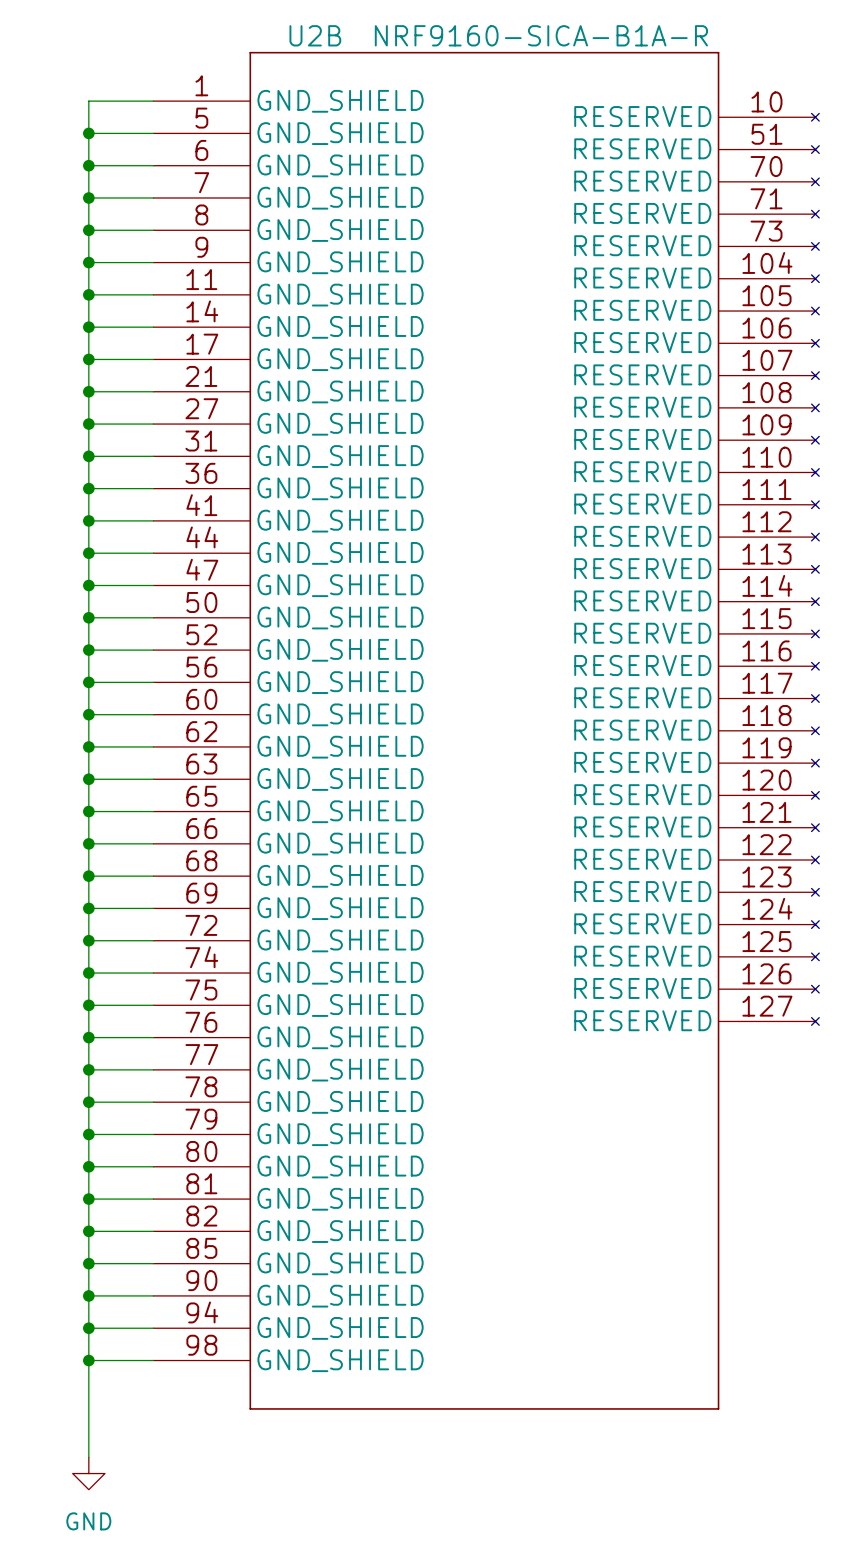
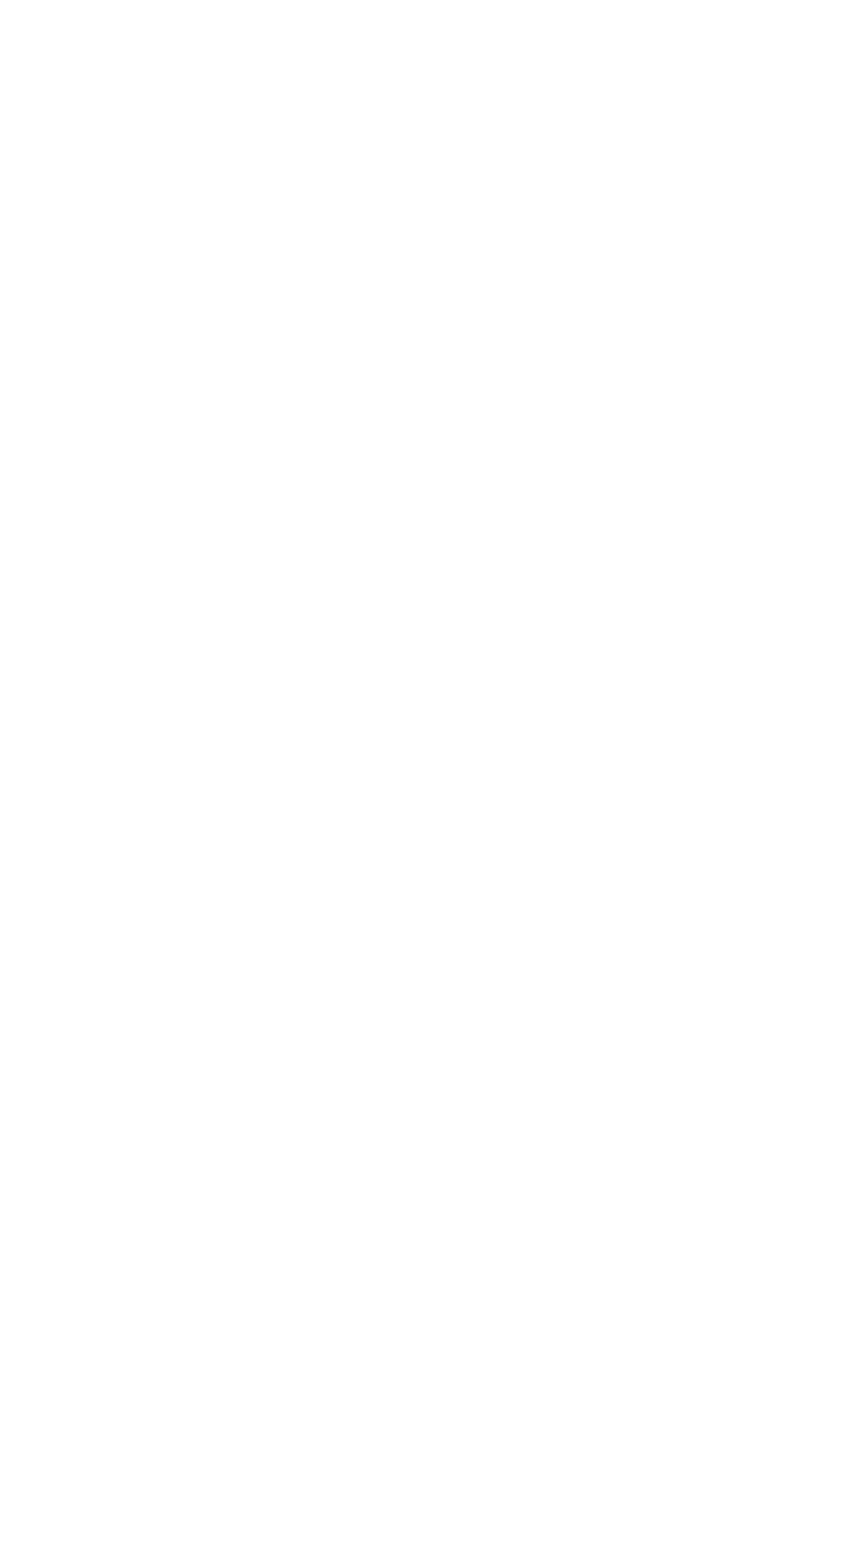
wire: (153, 101) (88, 101) (88, 1457) -> none
wire: (88, 133) (153, 133) -> none
junction: (88, 133) -> none
wire: (88, 165) (153, 165) -> none
junction: (88, 165) -> none
wire: (88, 197) (153, 197) -> none
junction: (88, 197) -> none
wire: (88, 230) (153, 230) -> none
junction: (88, 230) -> none
wire: (88, 262) (153, 262) -> none
junction: (88, 262) -> none
wire: (88, 294) (153, 294) -> none
junction: (88, 294) -> none
wire: (88, 327) (153, 327) -> none
junction: (88, 327) -> none
wire: (88, 359) (153, 359) -> none
junction: (88, 359) -> none
wire: (88, 391) (153, 391) -> none
junction: (88, 391) -> none
wire: (88, 424) (153, 424) -> none
junction: (88, 424) -> none
wire: (88, 456) (153, 456) -> none
junction: (88, 456) -> none
wire: (88, 488) (153, 488) -> none
junction: (88, 488) -> none
wire: (88, 520) (153, 520) -> none
junction: (88, 520) -> none
wire: (88, 553) (153, 553) -> none
junction: (88, 553) -> none
wire: (88, 585) (153, 585) -> none
junction: (88, 585) -> none
wire: (88, 617) (153, 617) -> none
junction: (88, 617) -> none
wire: (88, 650) (153, 650) -> none
junction: (88, 650) -> none
wire: (88, 682) (153, 682) -> none
junction: (88, 682) -> none
wire: (88, 714) (153, 714) -> none
junction: (88, 714) -> none
U2B: NRF9160-SICA-B1A-R (486, 730) -> none
wire: (88, 746) (153, 746) -> none
junction: (88, 746) -> none
wire: (88, 779) (153, 779) -> none
junction: (88, 779) -> none
wire: (88, 811) (153, 811) -> none
junction: (88, 811) -> none
wire: (88, 843) (153, 843) -> none
junction: (88, 843) -> none
wire: (88, 876) (153, 876) -> none
junction: (88, 876) -> none
wire: (88, 908) (153, 908) -> none
junction: (88, 908) -> none
wire: (88, 940) (153, 940) -> none
junction: (88, 940) -> none
wire: (88, 973) (153, 973) -> none
junction: (88, 973) -> none
wire: (88, 1005) (153, 1005) -> none
junction: (88, 1005) -> none
wire: (88, 1037) (153, 1037) -> none
junction: (88, 1037) -> none
wire: (88, 1069) (153, 1069) -> none
junction: (88, 1069) -> none
wire: (88, 1102) (153, 1102) -> none
junction: (88, 1102) -> none
wire: (88, 1134) (153, 1134) -> none
junction: (88, 1134) -> none
wire: (88, 1166) (153, 1166) -> none
junction: (88, 1166) -> none
wire: (88, 1199) (153, 1199) -> none
junction: (88, 1199) -> none
wire: (88, 1231) (153, 1231) -> none
junction: (88, 1231) -> none
wire: (88, 1263) (153, 1263) -> none
junction: (88, 1263) -> none
wire: (88, 1295) (153, 1295) -> none
junction: (88, 1295) -> none
wire: (88, 1328) (153, 1328) -> none
junction: (88, 1328) -> none
wire: (88, 1360) (153, 1360) -> none
junction: (88, 1360) -> none
power symbol: GND (88, 1473) -> none

